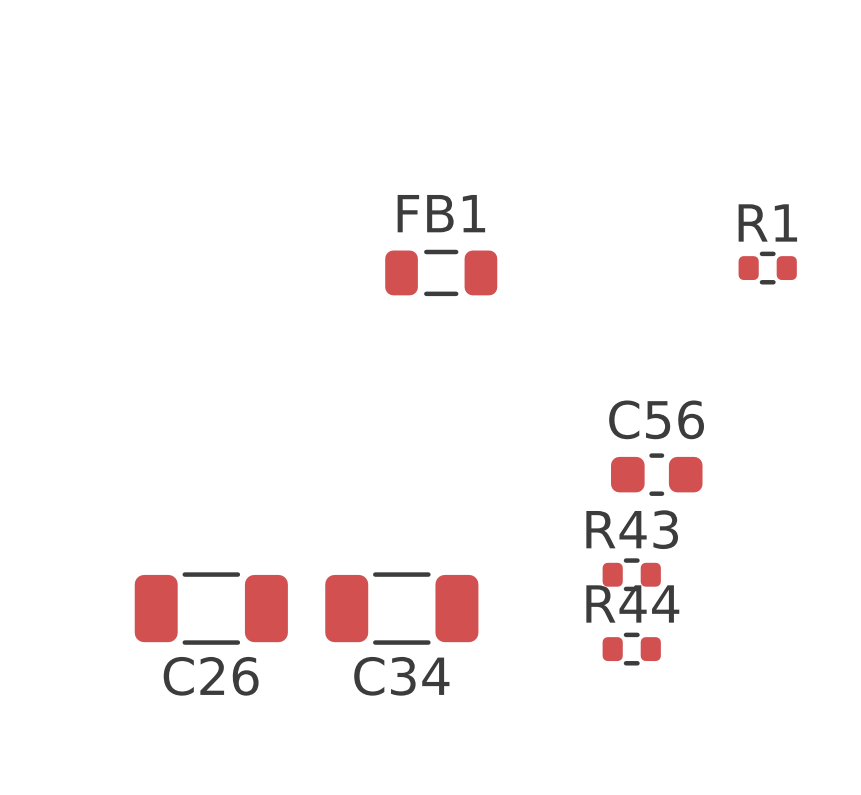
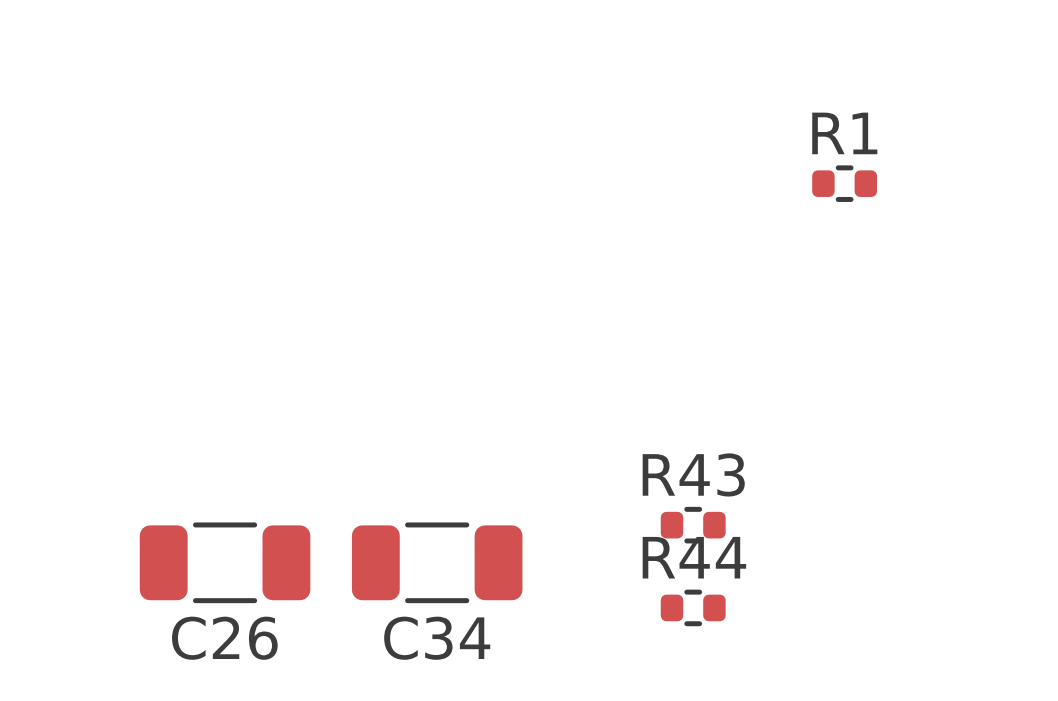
FB1: (441, 272) -> none
C56: (656, 474) -> none

